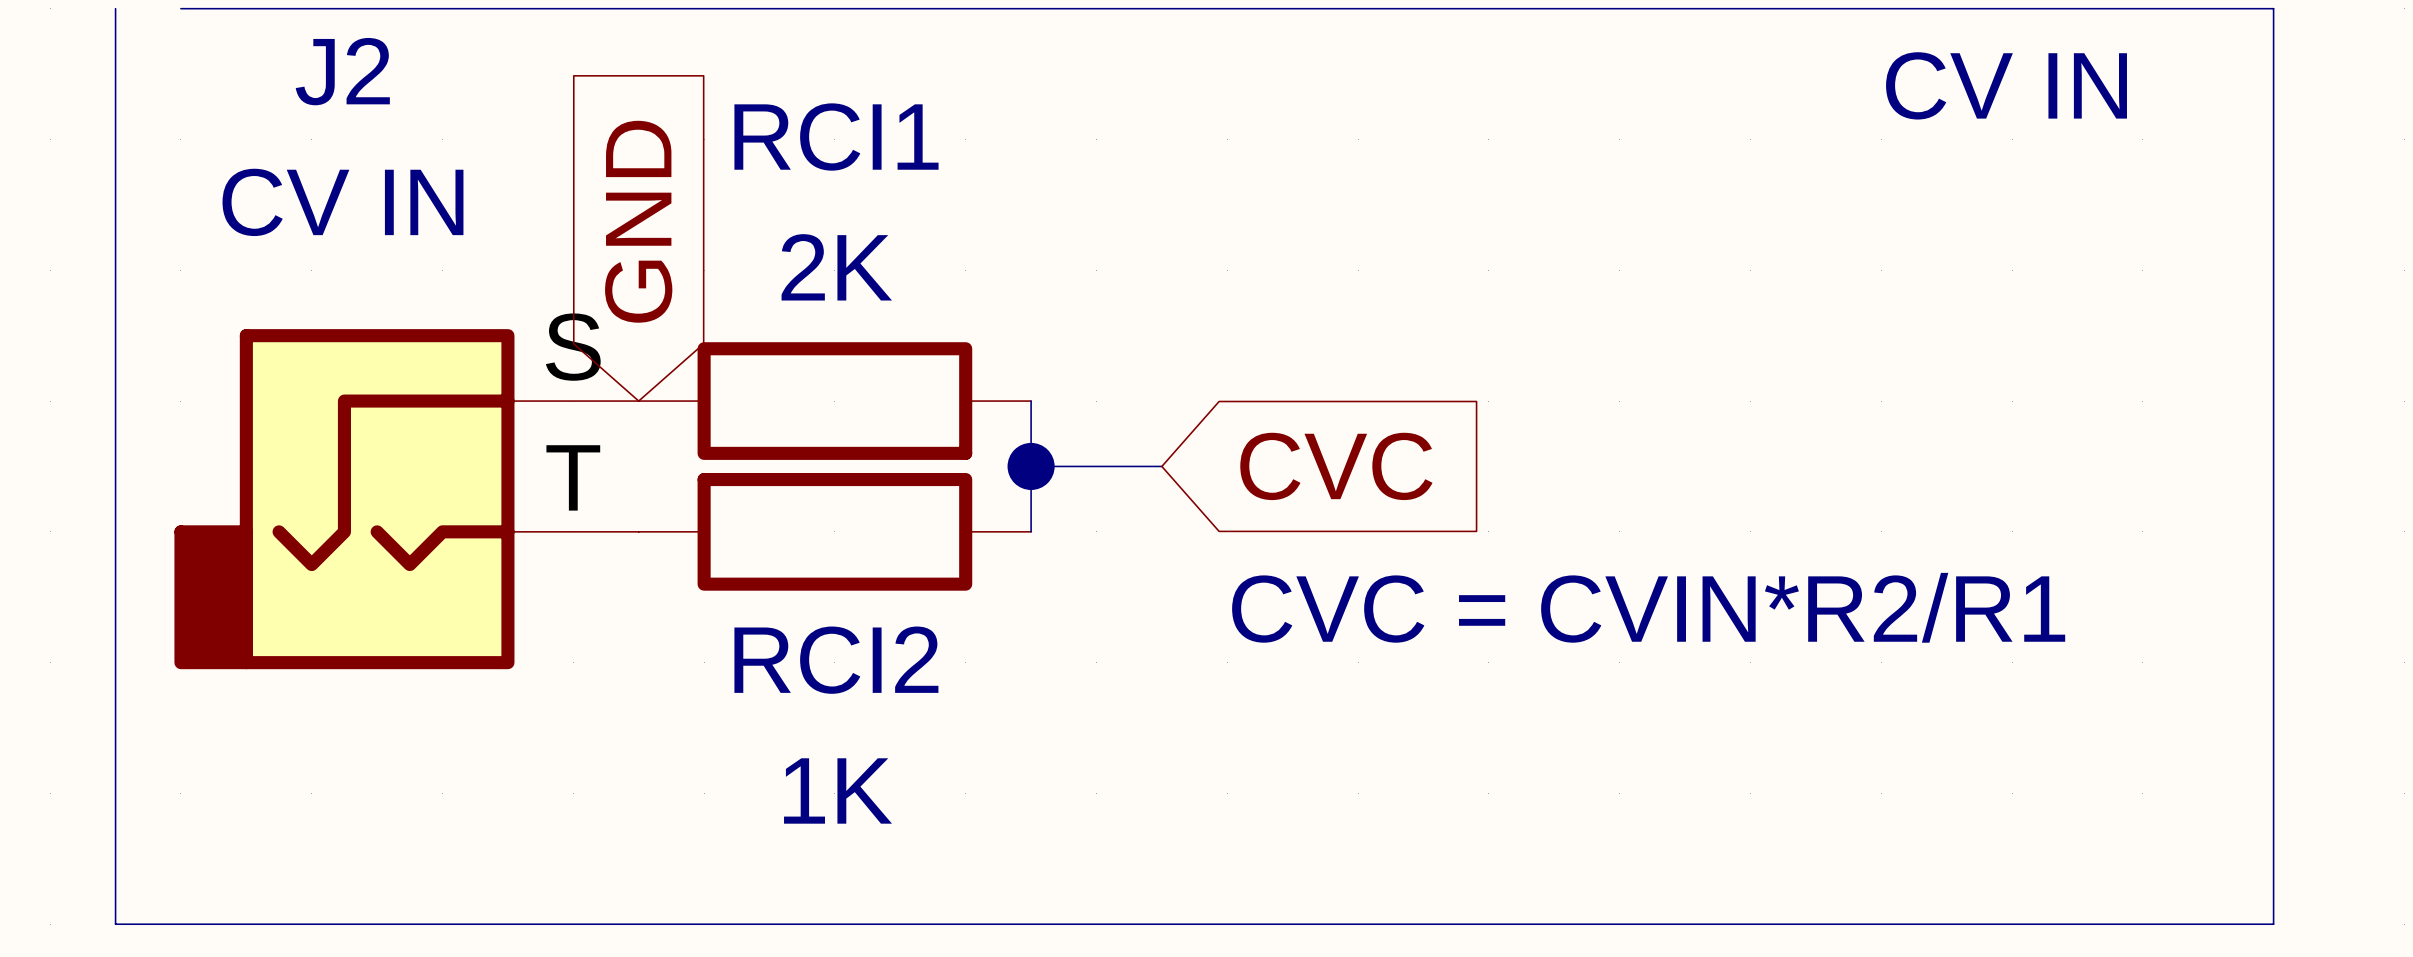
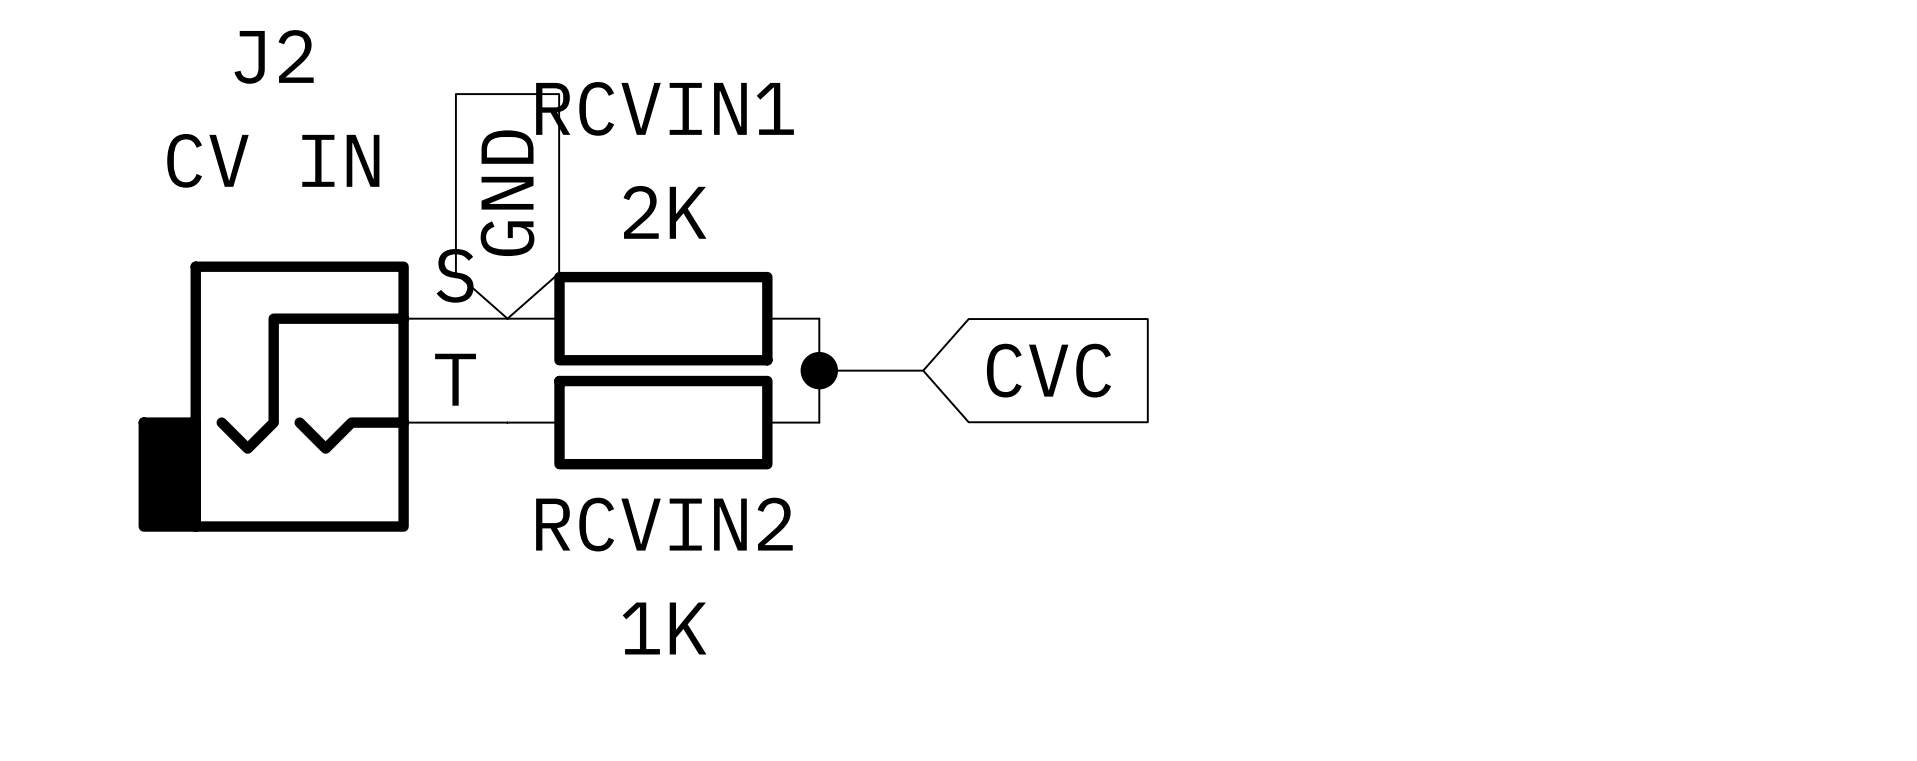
line: (115, 8) (115, 924) (2273, 924) (2273, 8) (180, 8) -> none
text: CV IN (2006, 85) -> none
RCI1 name: RCI1 (836, 137) -> RCVIN1 (665, 108)
text: CVC = CVIN*R2/R1 (1648, 607) -> none
RCI2 name: RCI2 (836, 660) -> RCVIN2 (664, 524)

